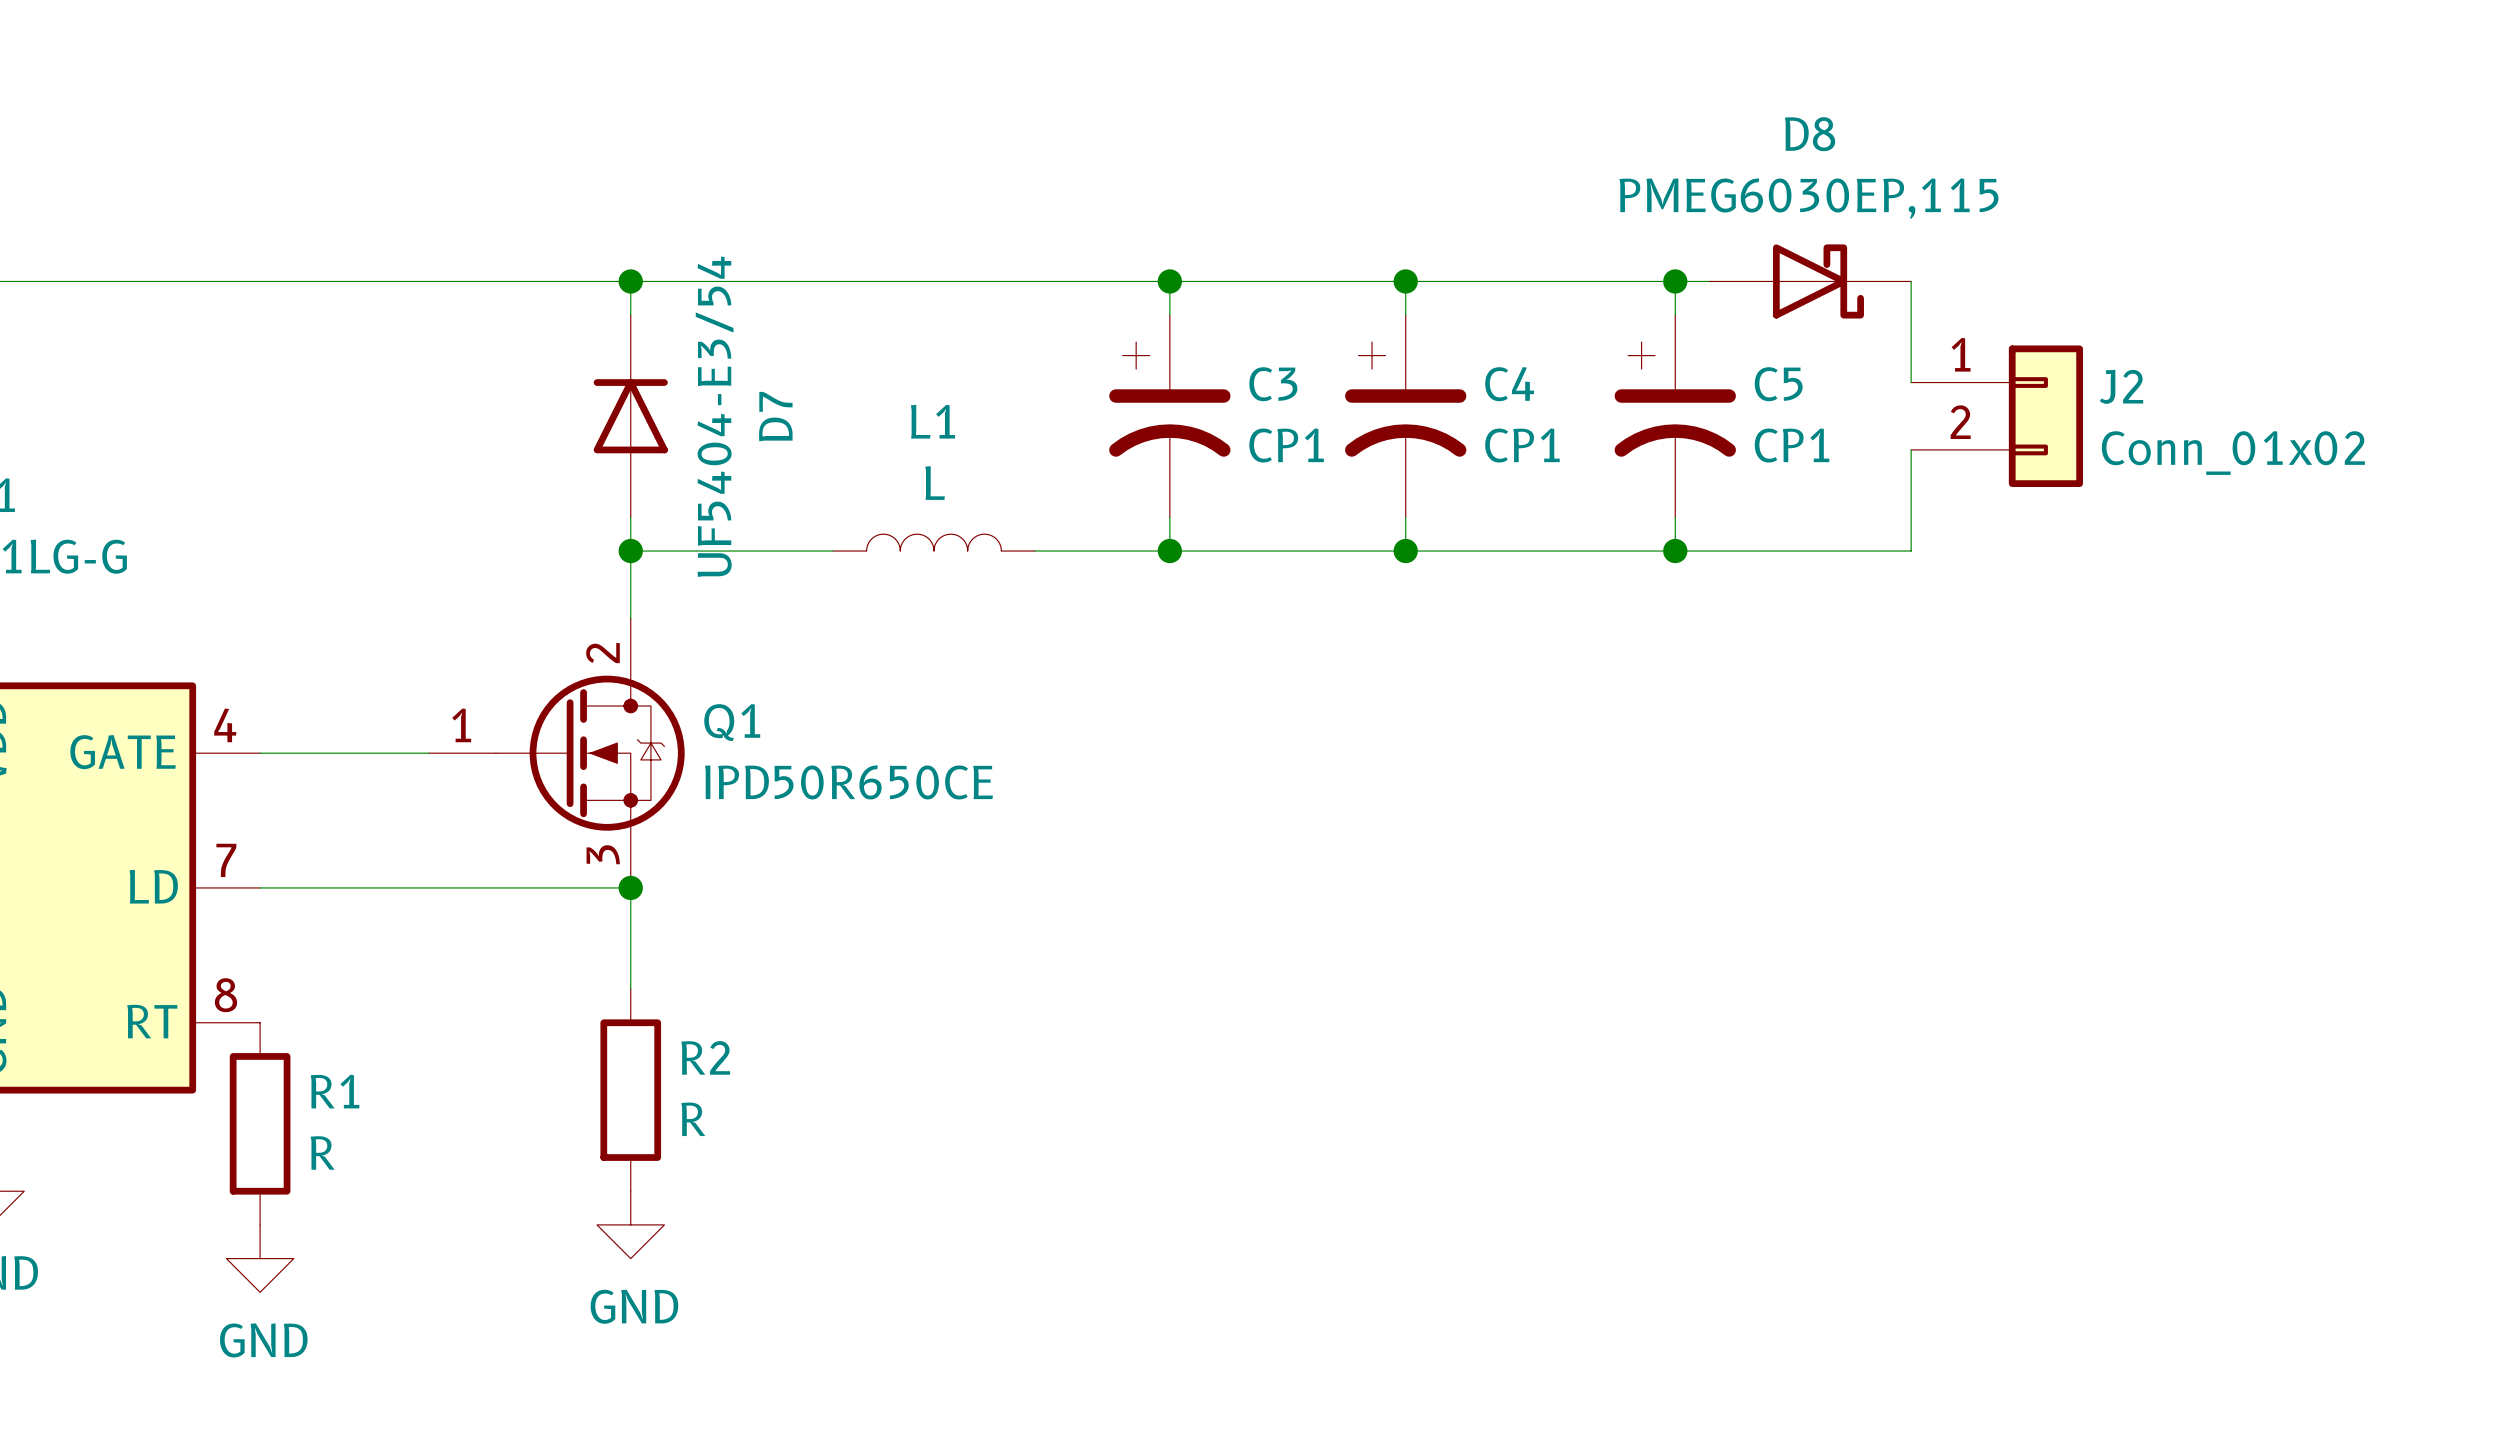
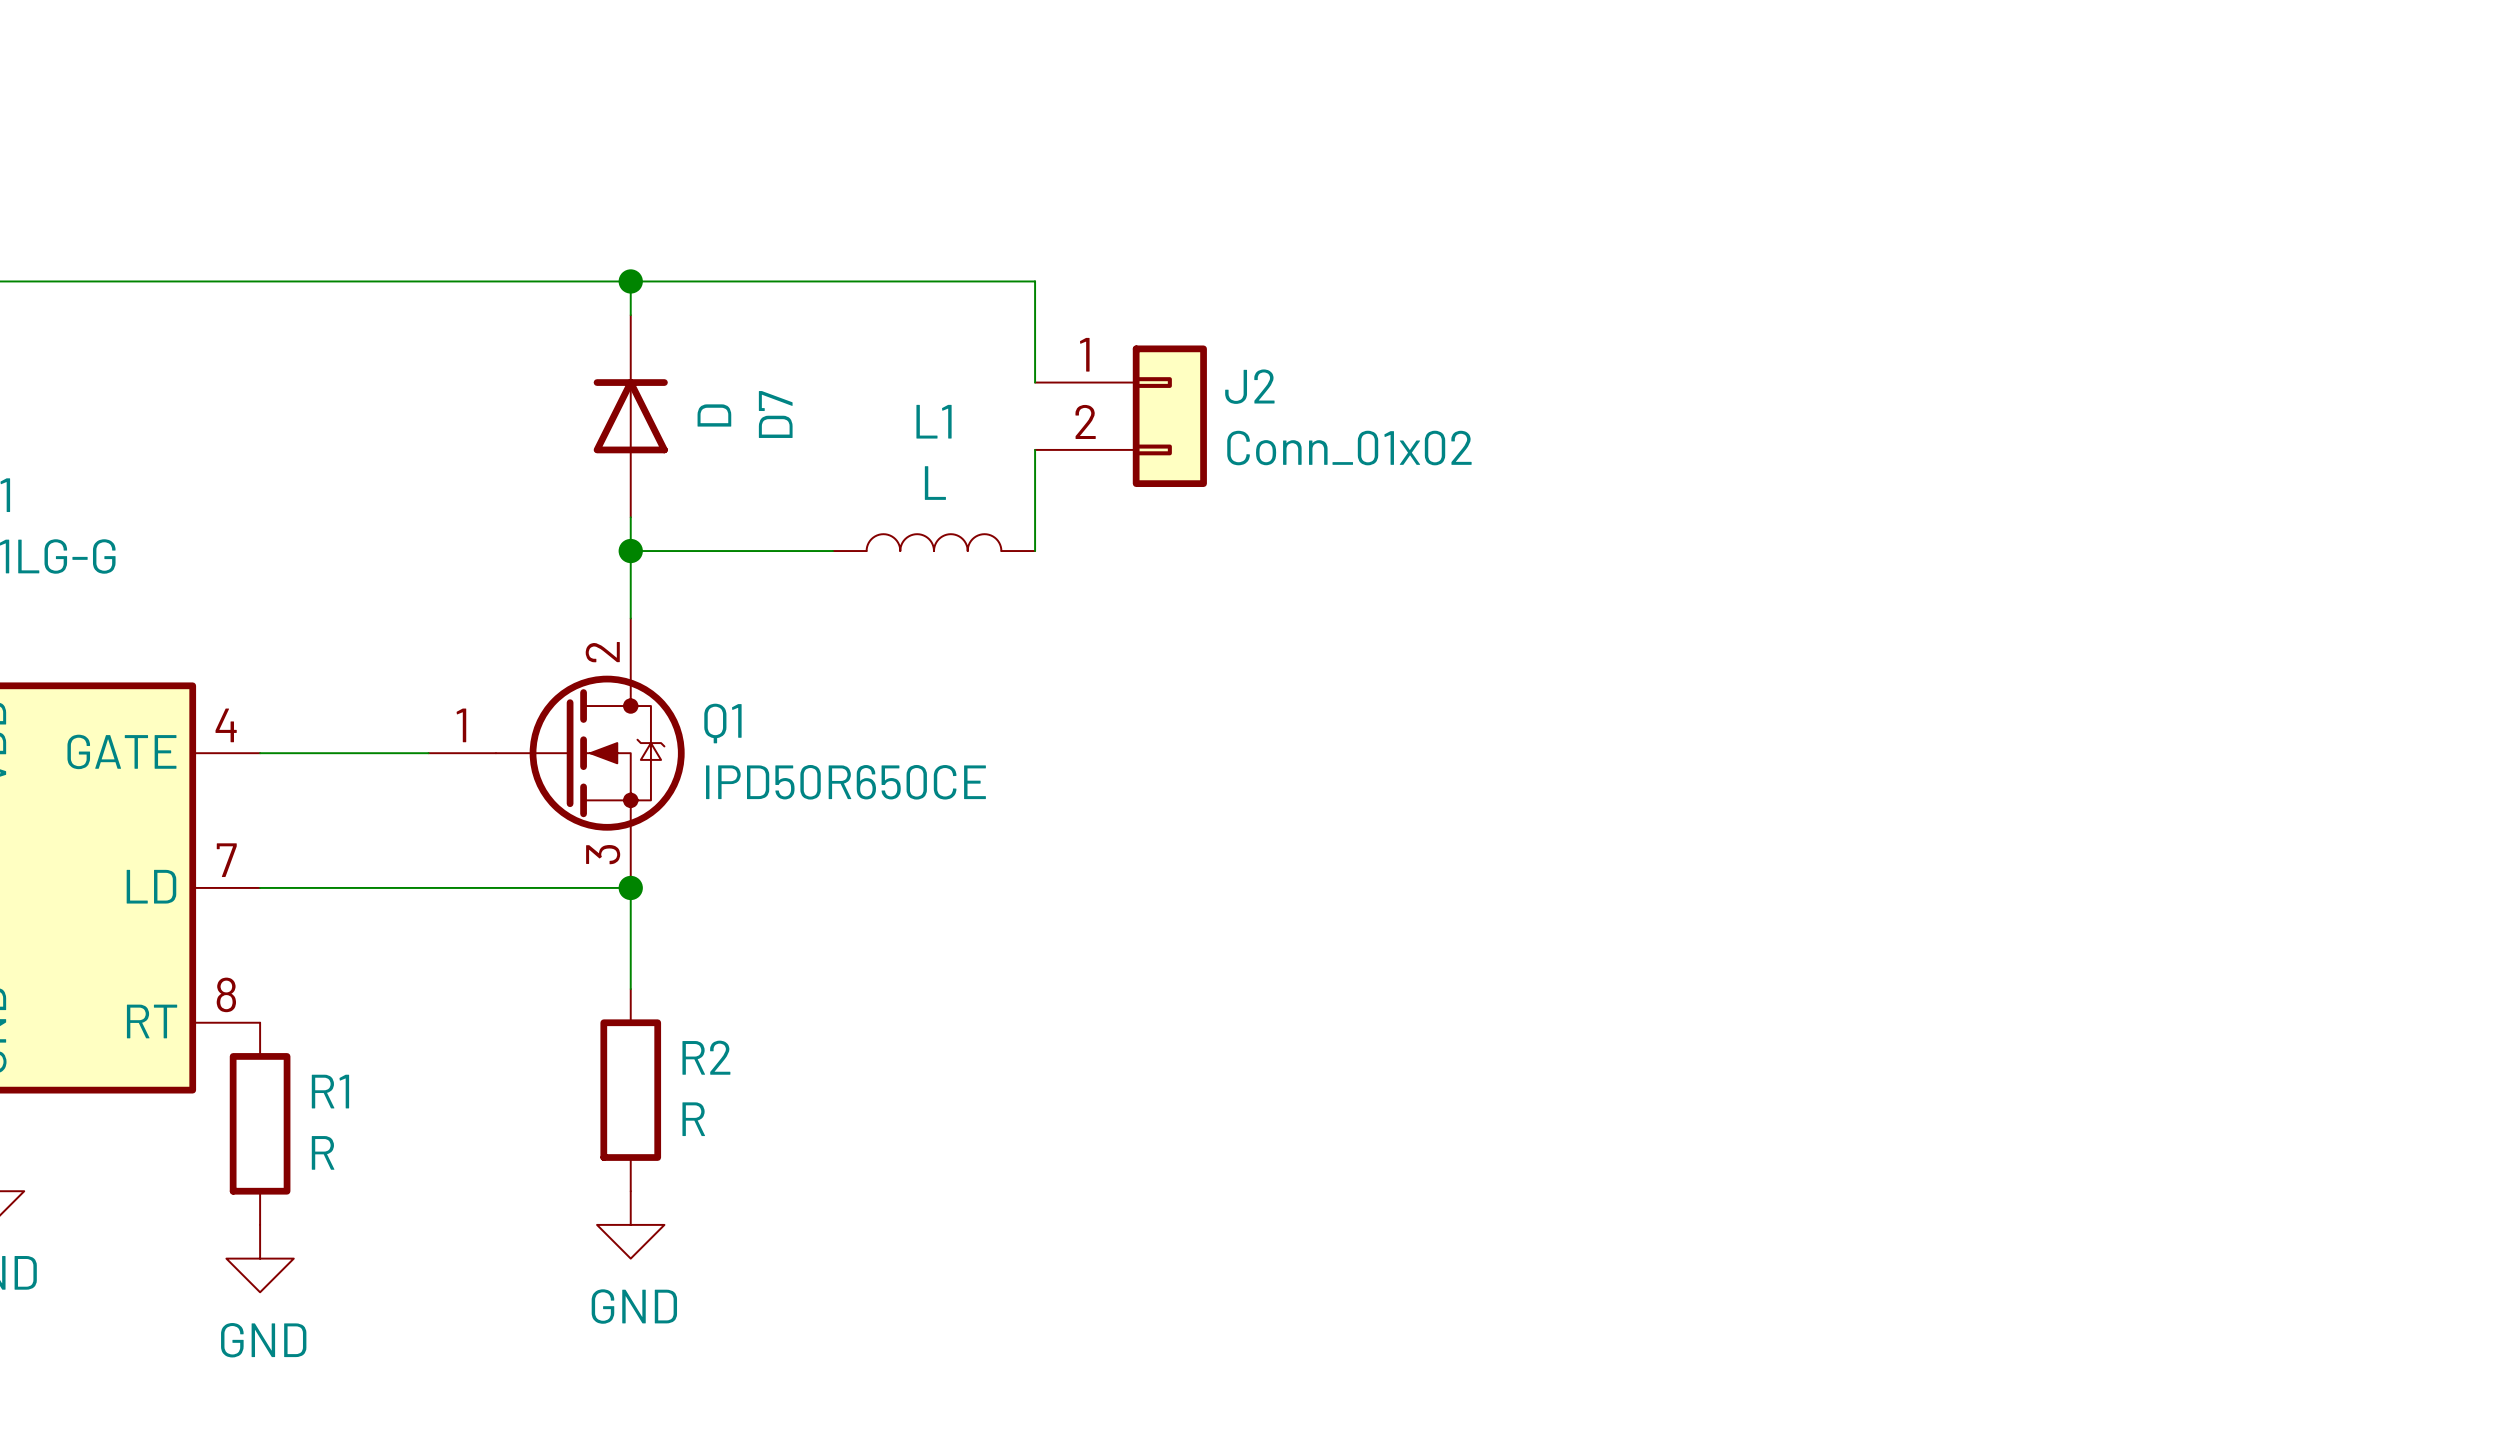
wire: (1035, 281) (1708, 281) -> (1035, 281) (1035, 382)
wire: (1169, 281) (1169, 315) -> none
junction: (1169, 281) -> none
wire: (1405, 281) (1405, 315) -> none
junction: (1405, 281) -> none
wire: (1675, 281) (1675, 315) -> none
junction: (1675, 281) -> none
D8: PMEG6030EP,115 (1810, 281) -> none
wire: (1911, 281) (1911, 382) -> none
D7 value: UF5404-E3/54 (714, 416) -> D (714, 415)
C3: CP1 (1169, 416) -> none
C4: CP1 (1405, 416) -> none
C5: CP1 (1675, 416) -> none
J2 position: (1997, 416) -> (1121, 416)
wire: (1911, 449) (1911, 551) (1035, 551) -> (1035, 449) (1035, 551)
wire: (1169, 517) (1169, 551) -> none
wire: (1405, 517) (1405, 551) -> none
wire: (1675, 517) (1675, 551) -> none
junction: (1169, 551) -> none
junction: (1405, 551) -> none
junction: (1675, 551) -> none

